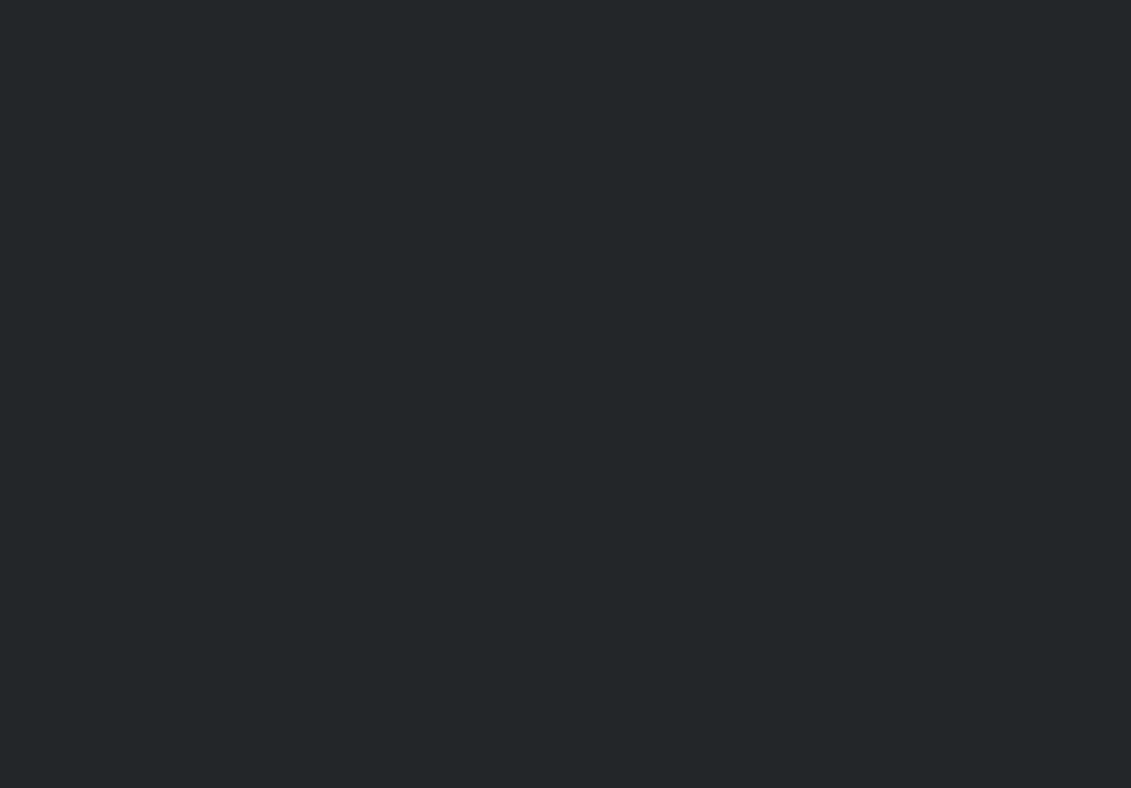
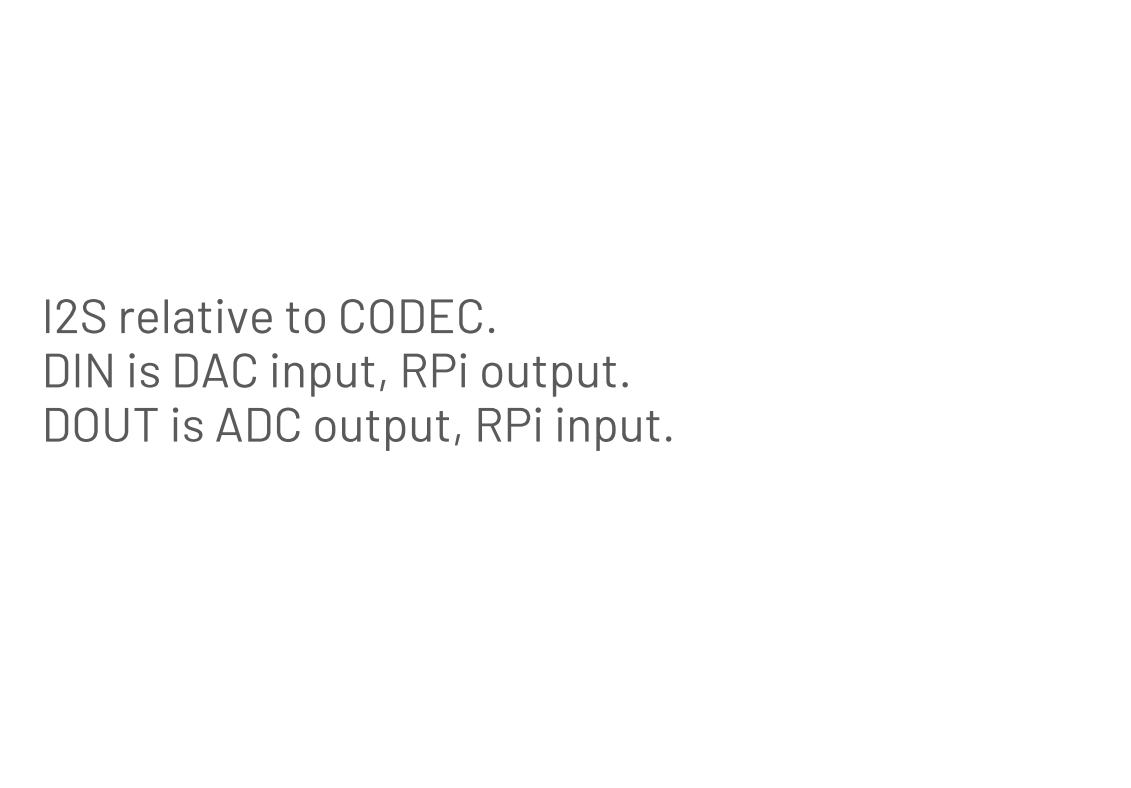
text: none -> I2S relative to CODEC. (270, 316)
text: none -> DIN is DAC input, RPi output. (336, 374)
text: none -> DOUT is ADC output, RPi input. (358, 429)

